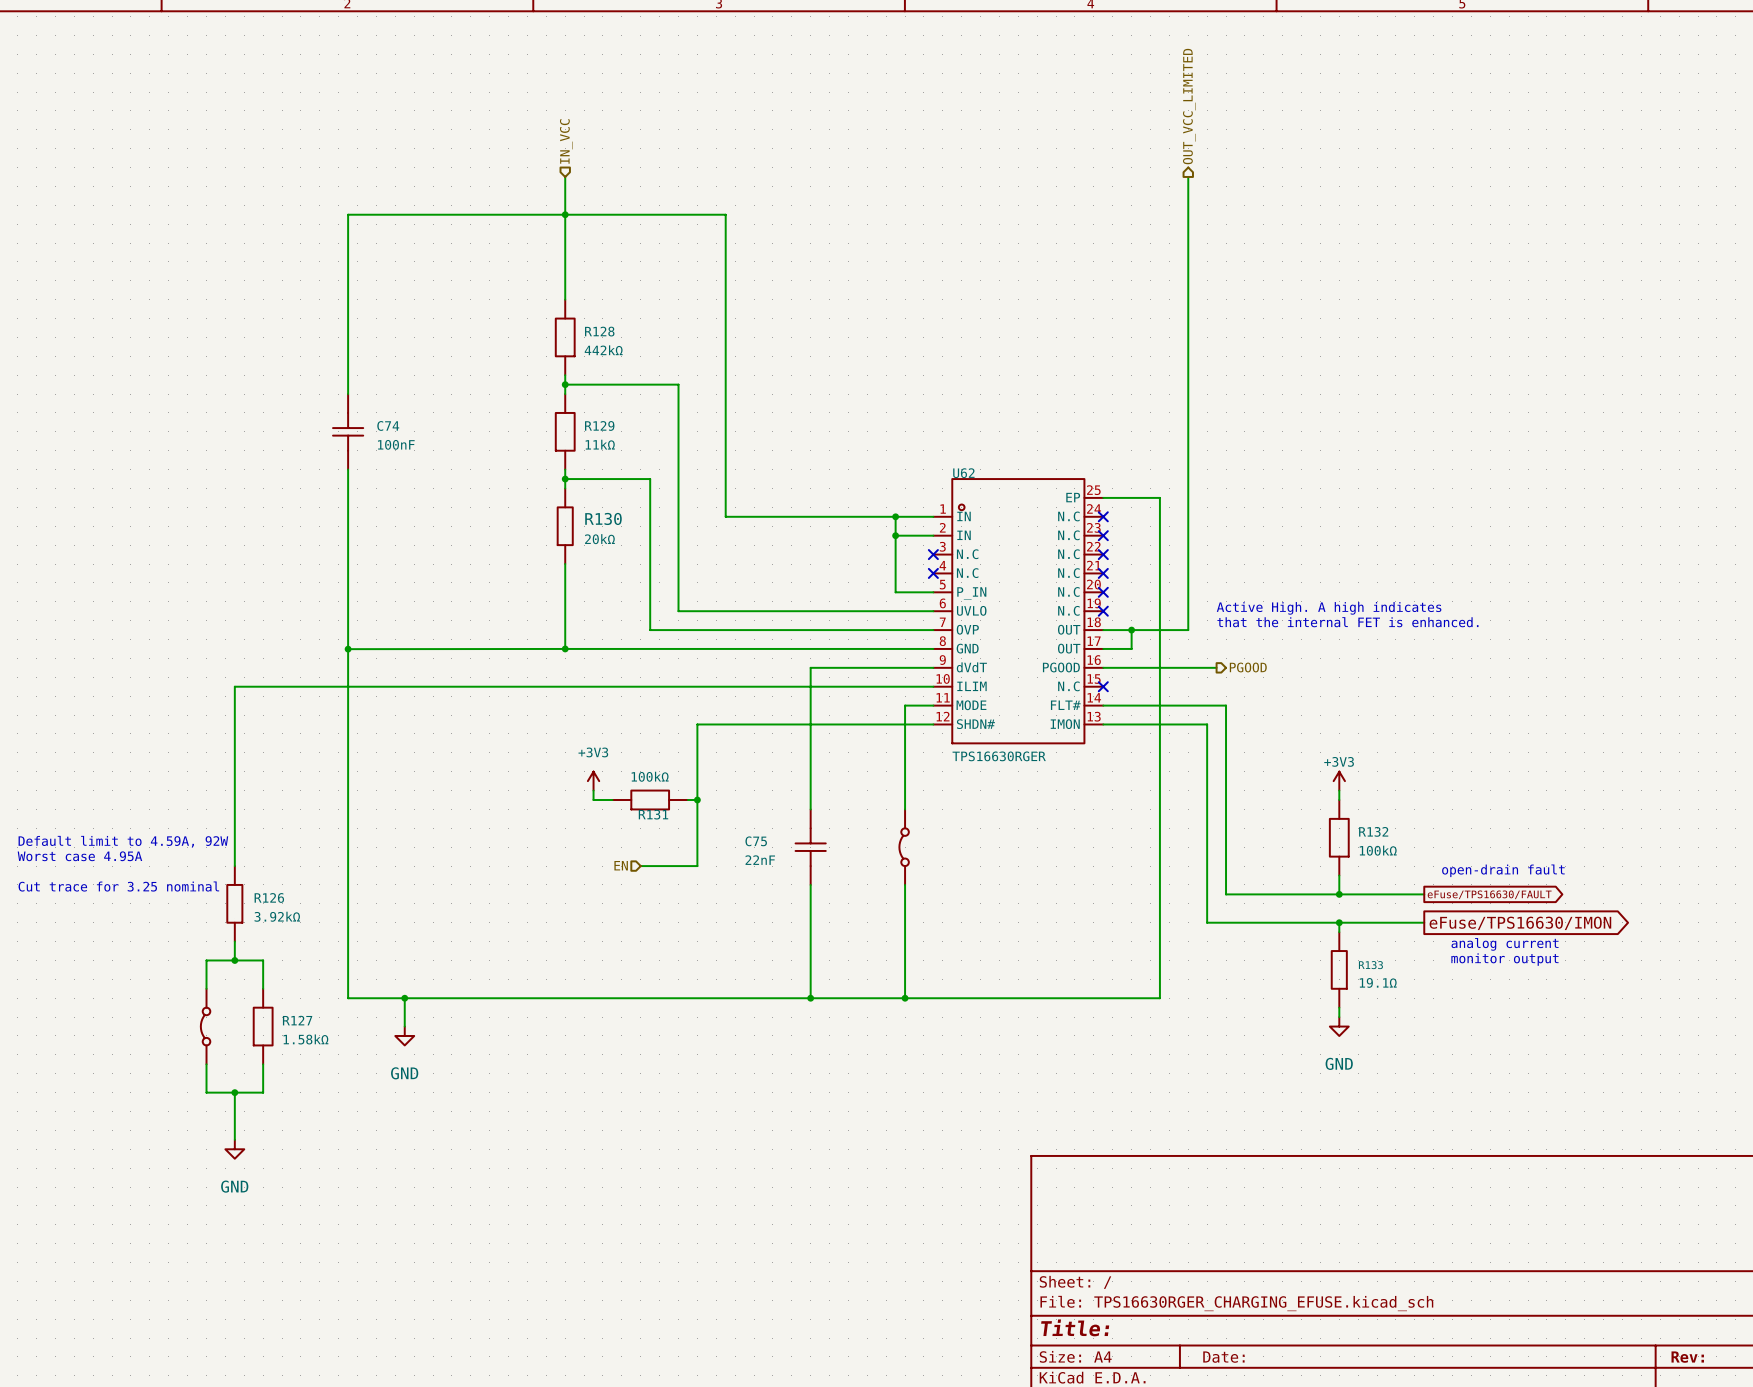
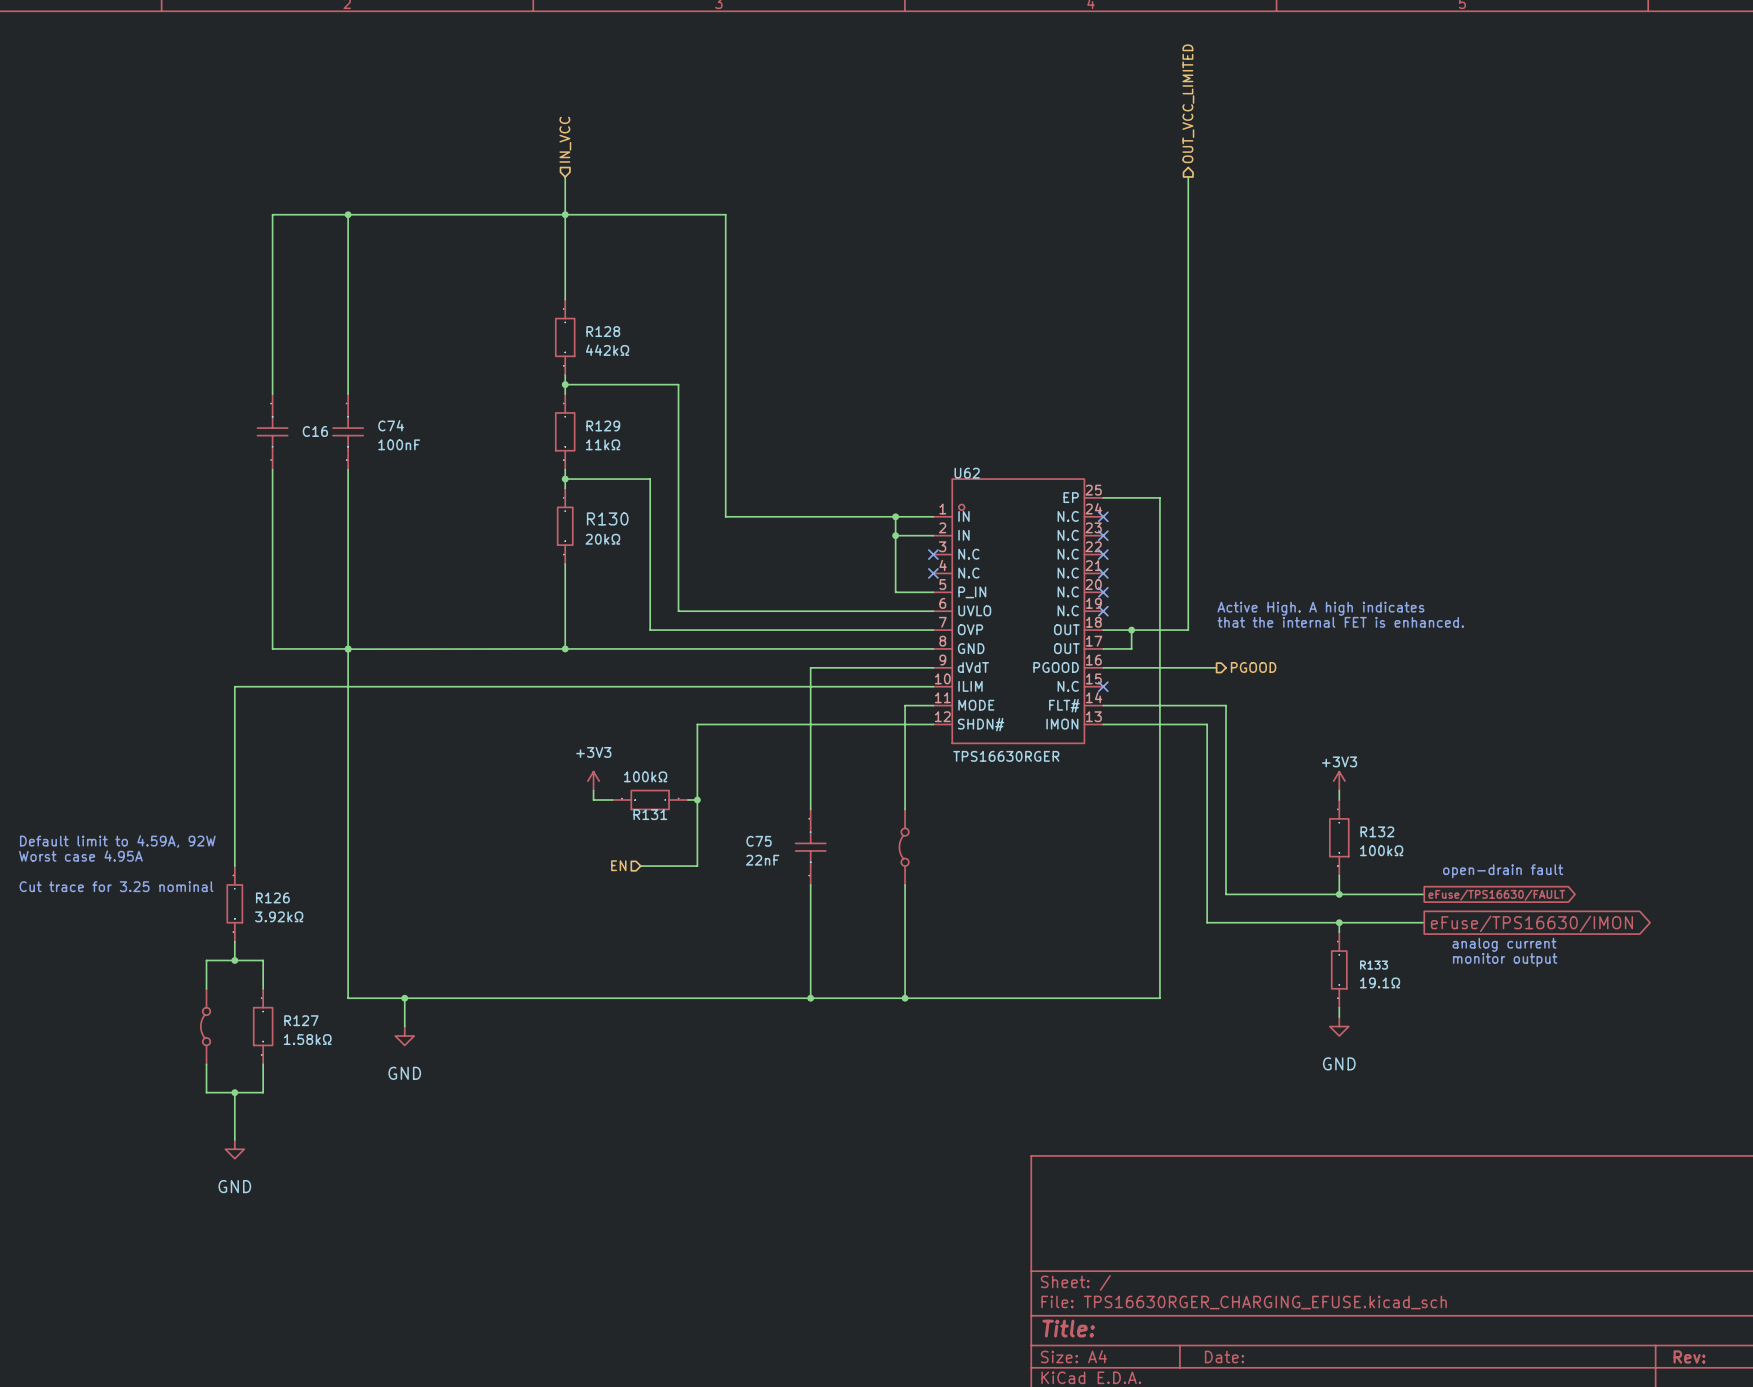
wire: none -> (348, 214) (272, 214) (272, 394)
junction: none -> (348, 214)
C16: none -> (272, 431)
wire: none -> (272, 469) (272, 648) (348, 648)

